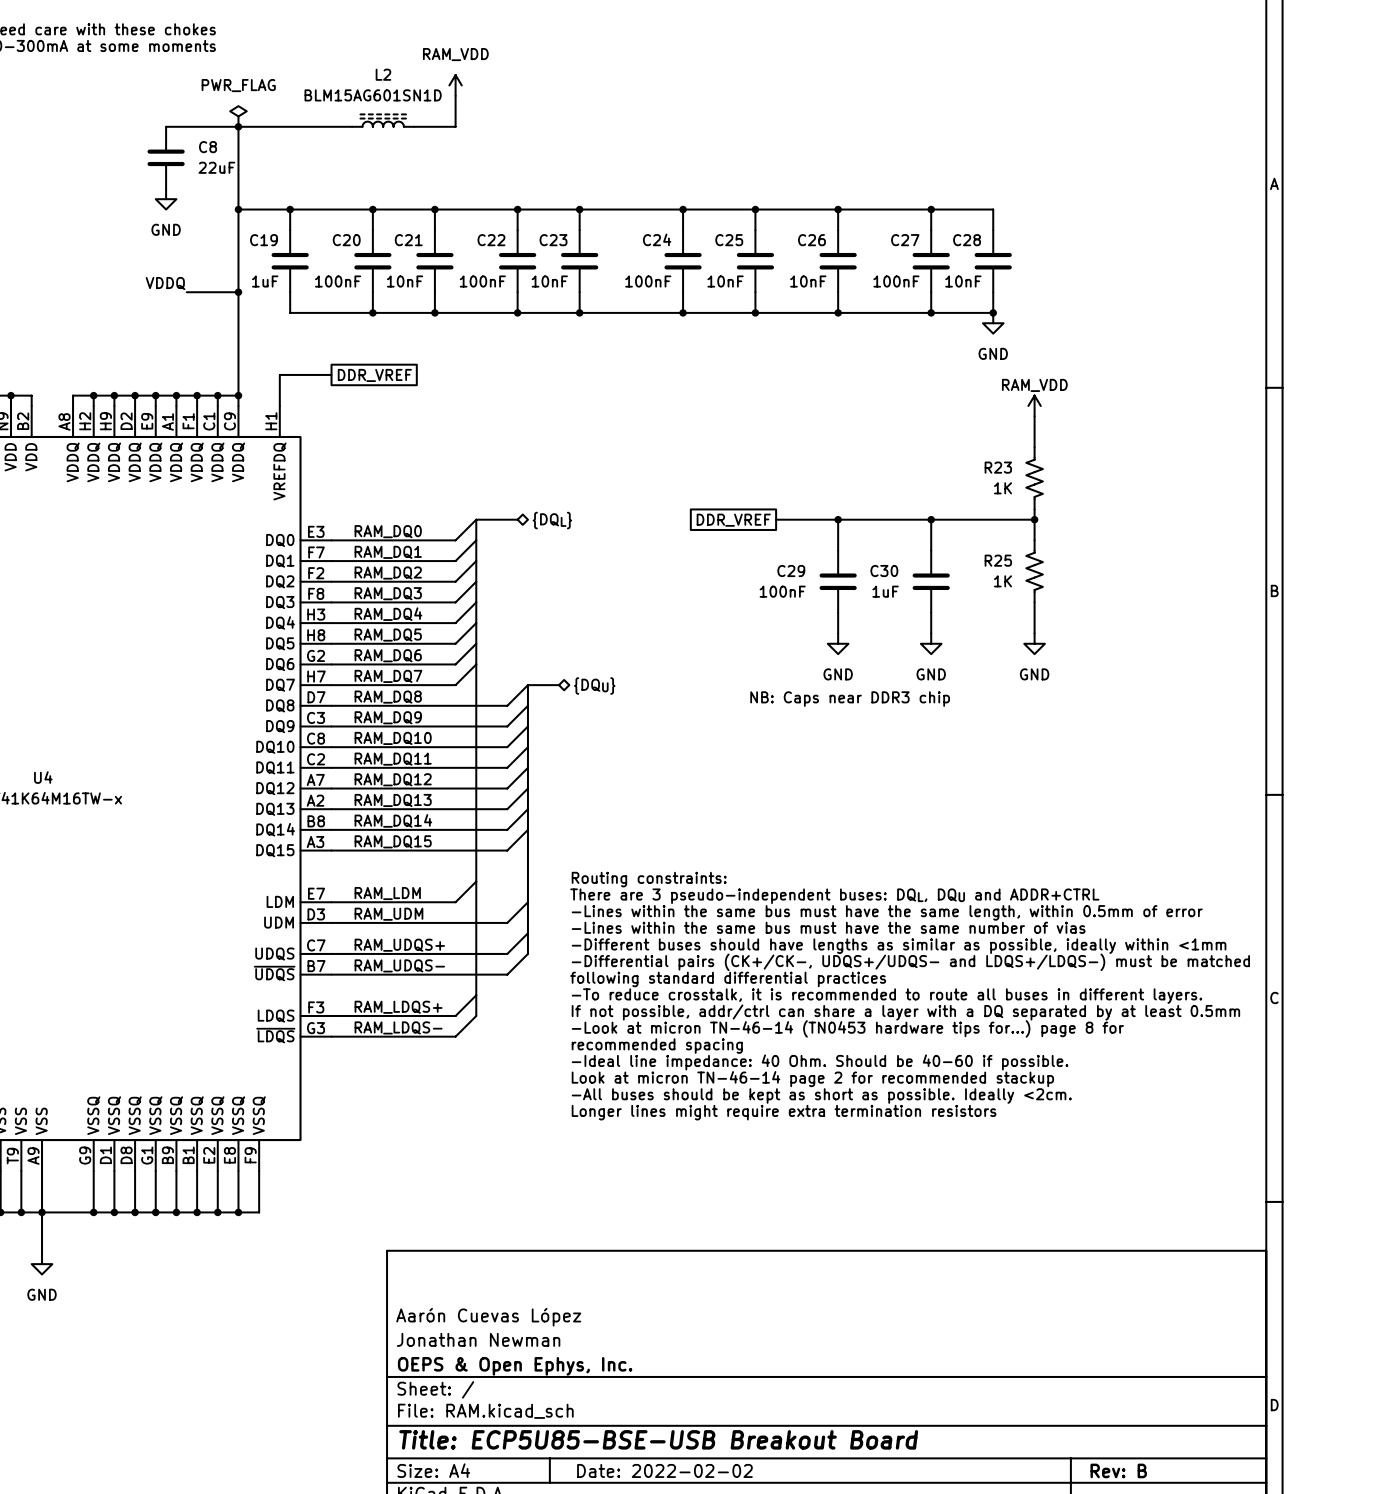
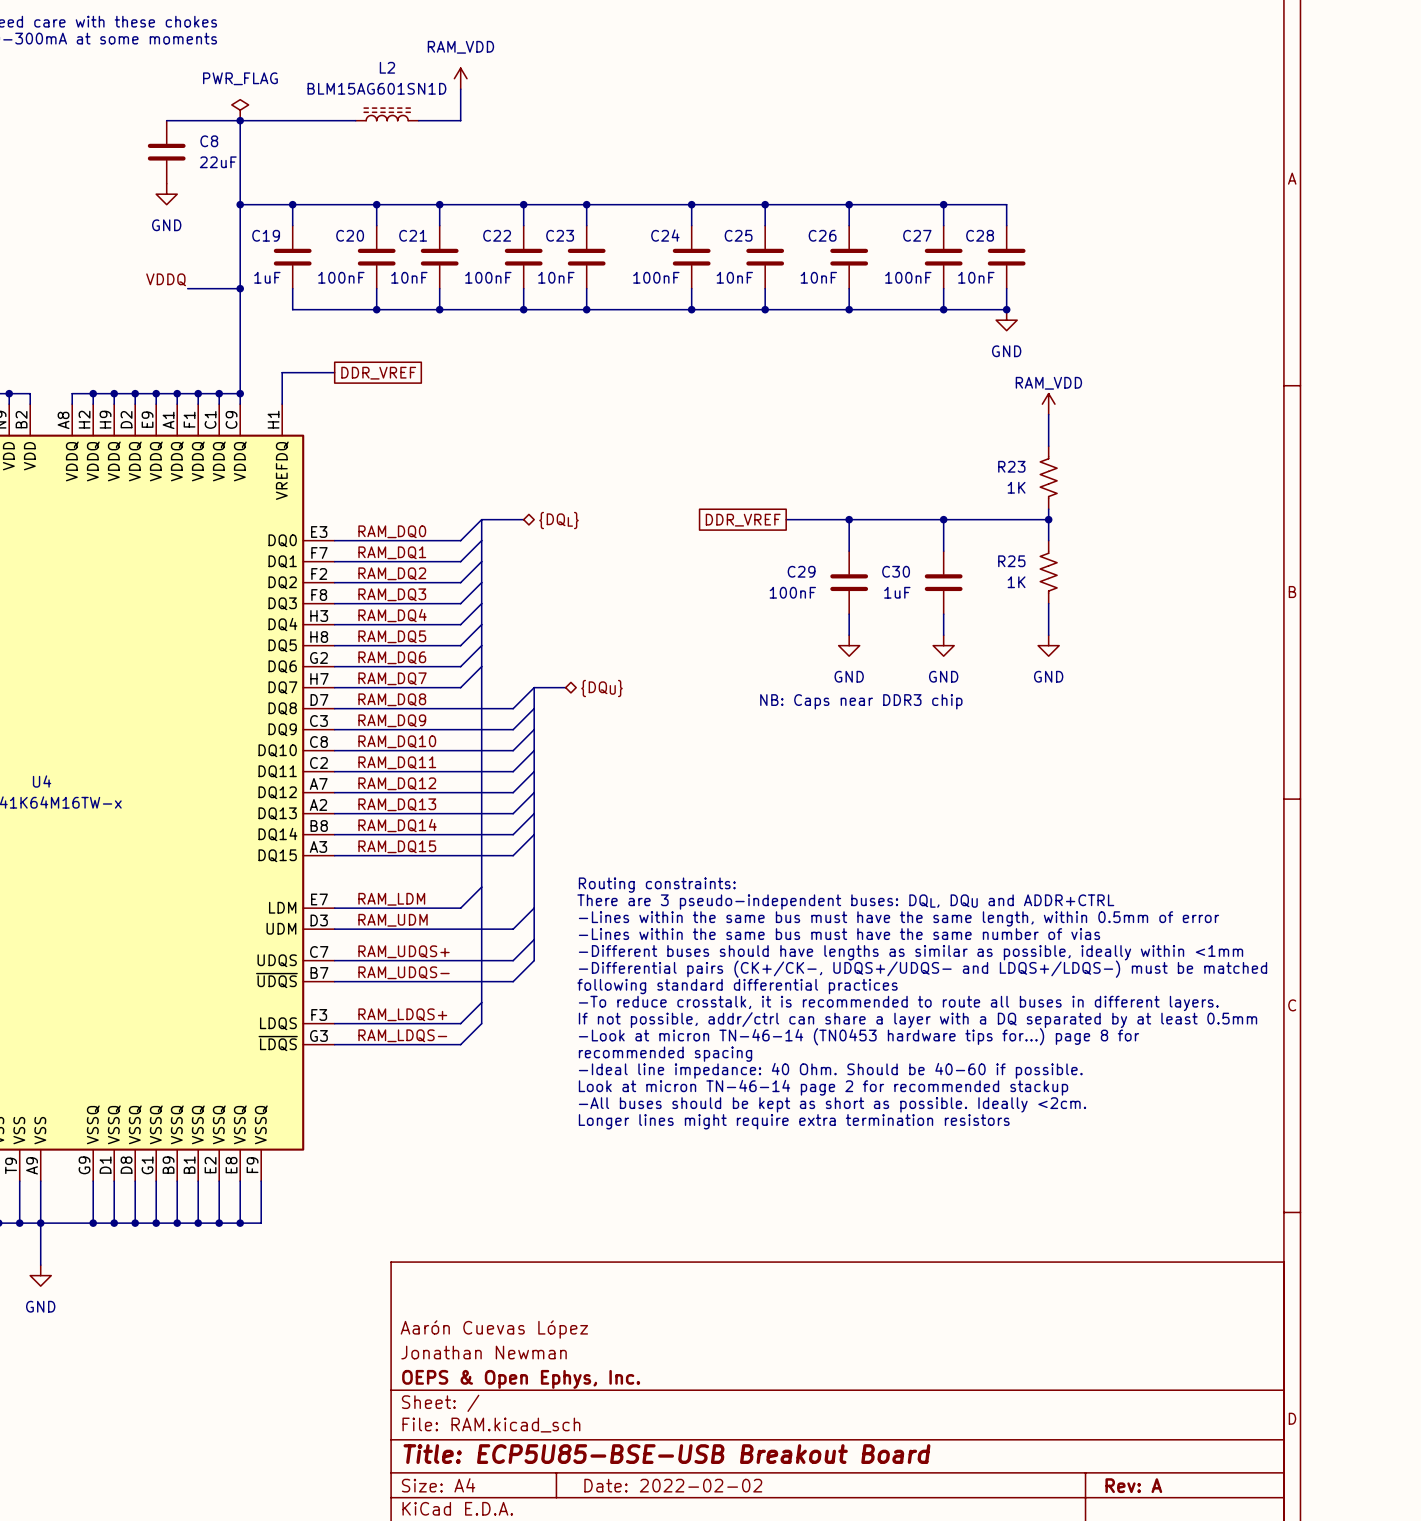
title block: Rev: B (1118, 1470) -> Rev: A (1133, 1485)

